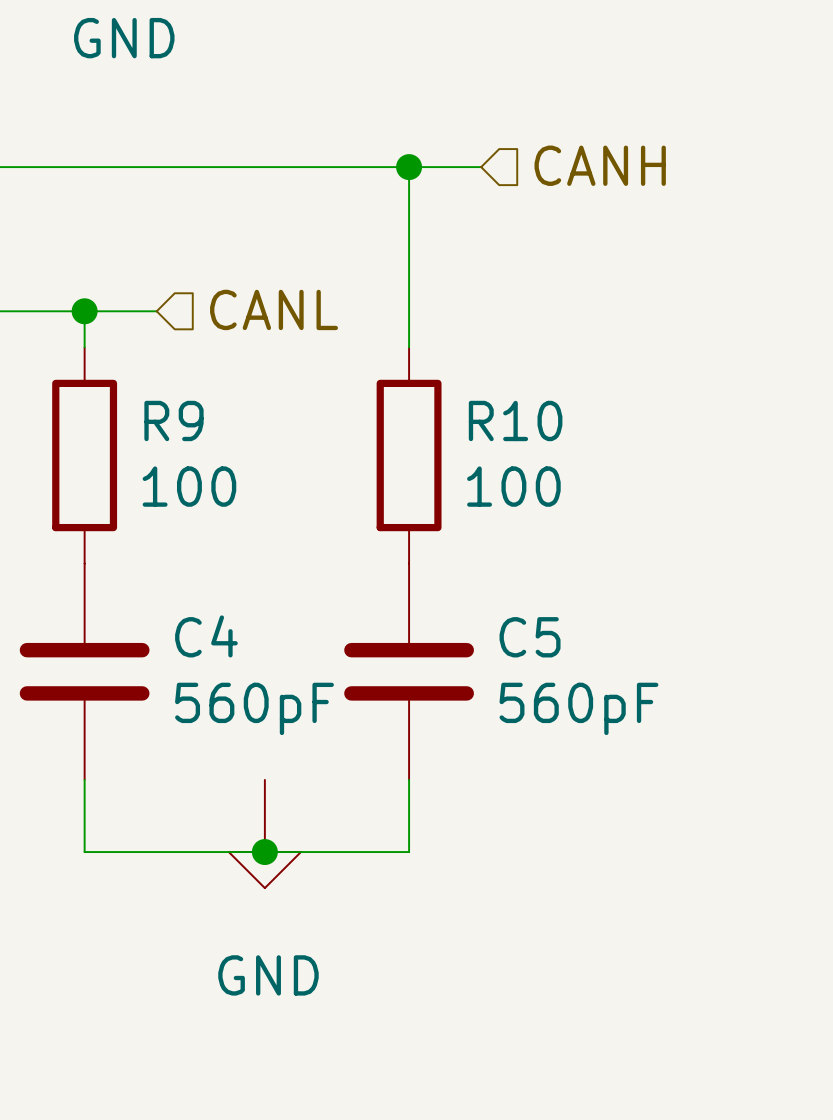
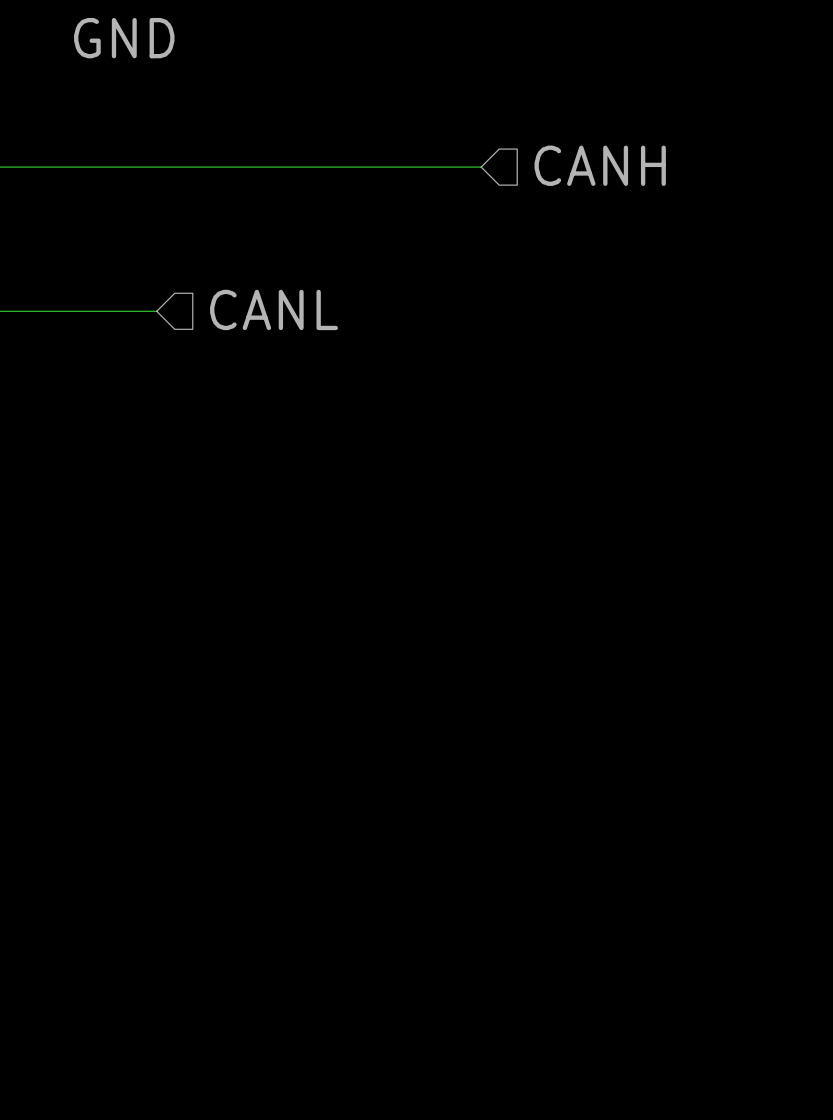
wire: (409, 167) (409, 347) -> none
junction: (409, 167) -> none
wire: (84, 311) (84, 347) -> none
junction: (84, 311) -> none
R9: 100 (84, 455) -> none
R10: 100 (409, 455) -> none
C4: 560pF (84, 671) -> none
C5: 560pF (409, 671) -> none
wire: (84, 779) (84, 852) (409, 852) (409, 779) -> none
power symbol: GND (264, 834) -> none
junction: (264, 852) -> none

